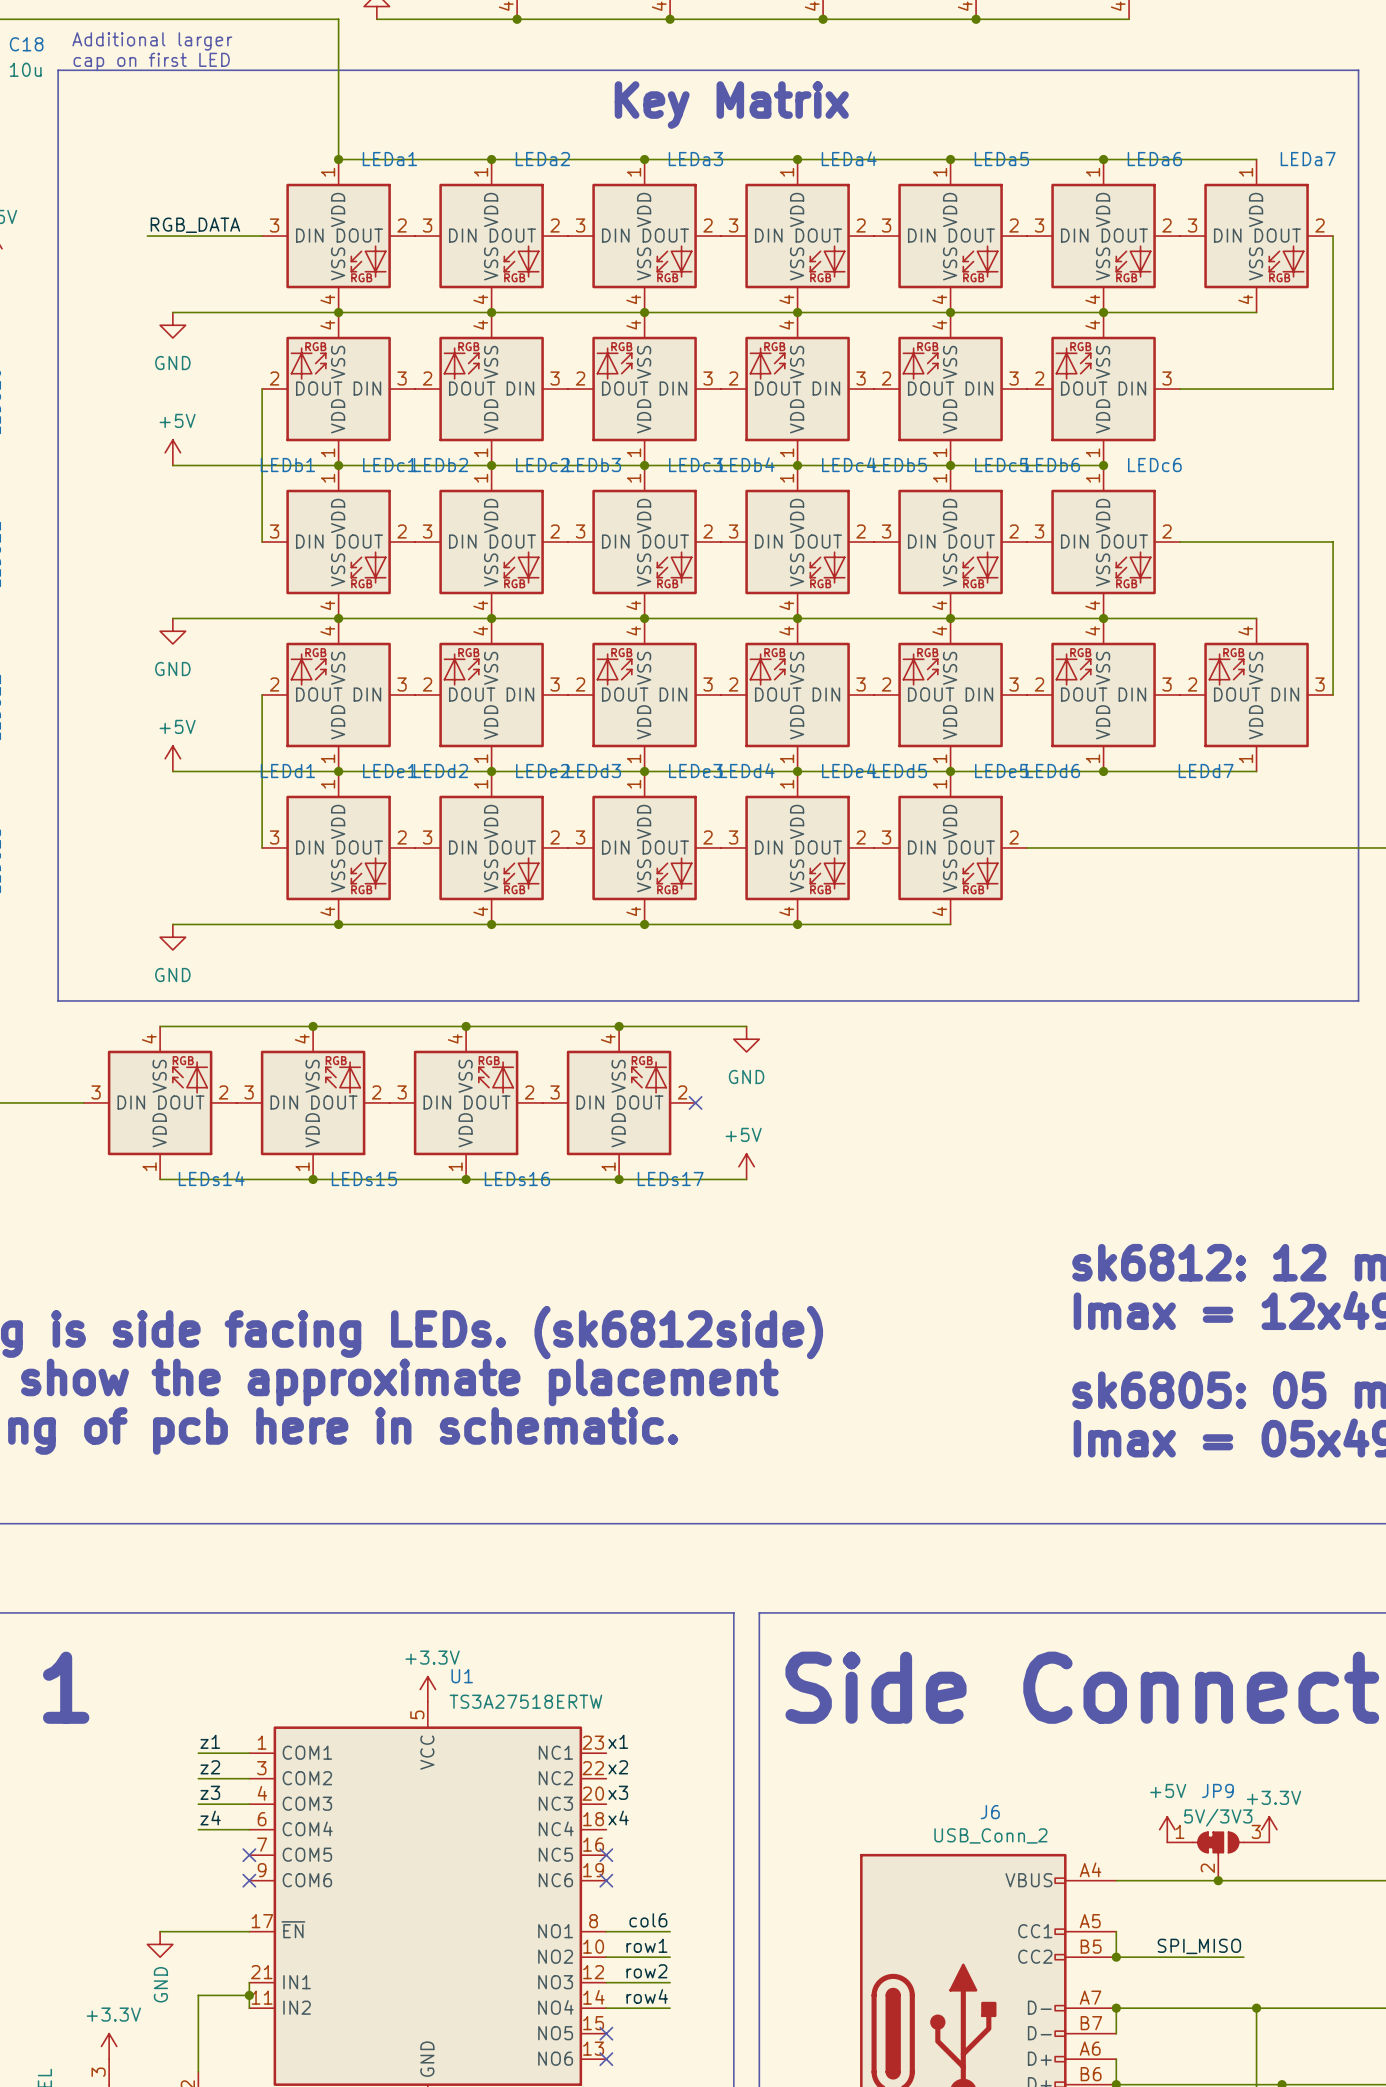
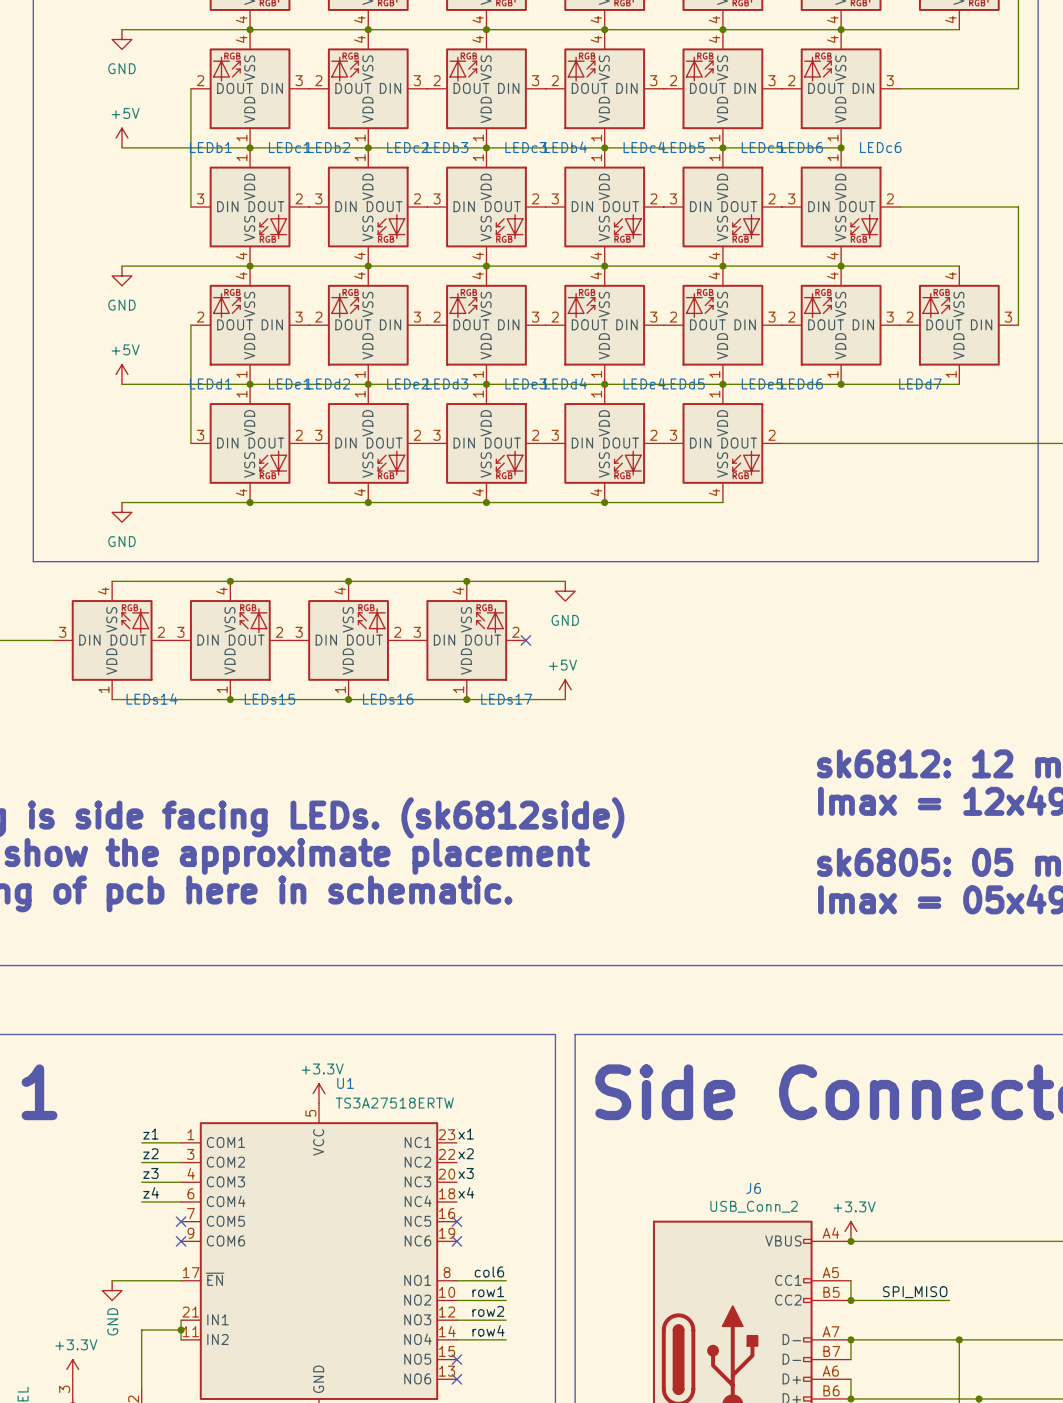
power symbol: +5V (1167, 1829) -> none
power symbol position: +3.3V (1269, 1829) -> +3.3V (850, 1231)
JP9: 5V/3V3 (1218, 1856) -> none
junction: none -> (850, 1241)
junction: (1218, 1880) -> none

